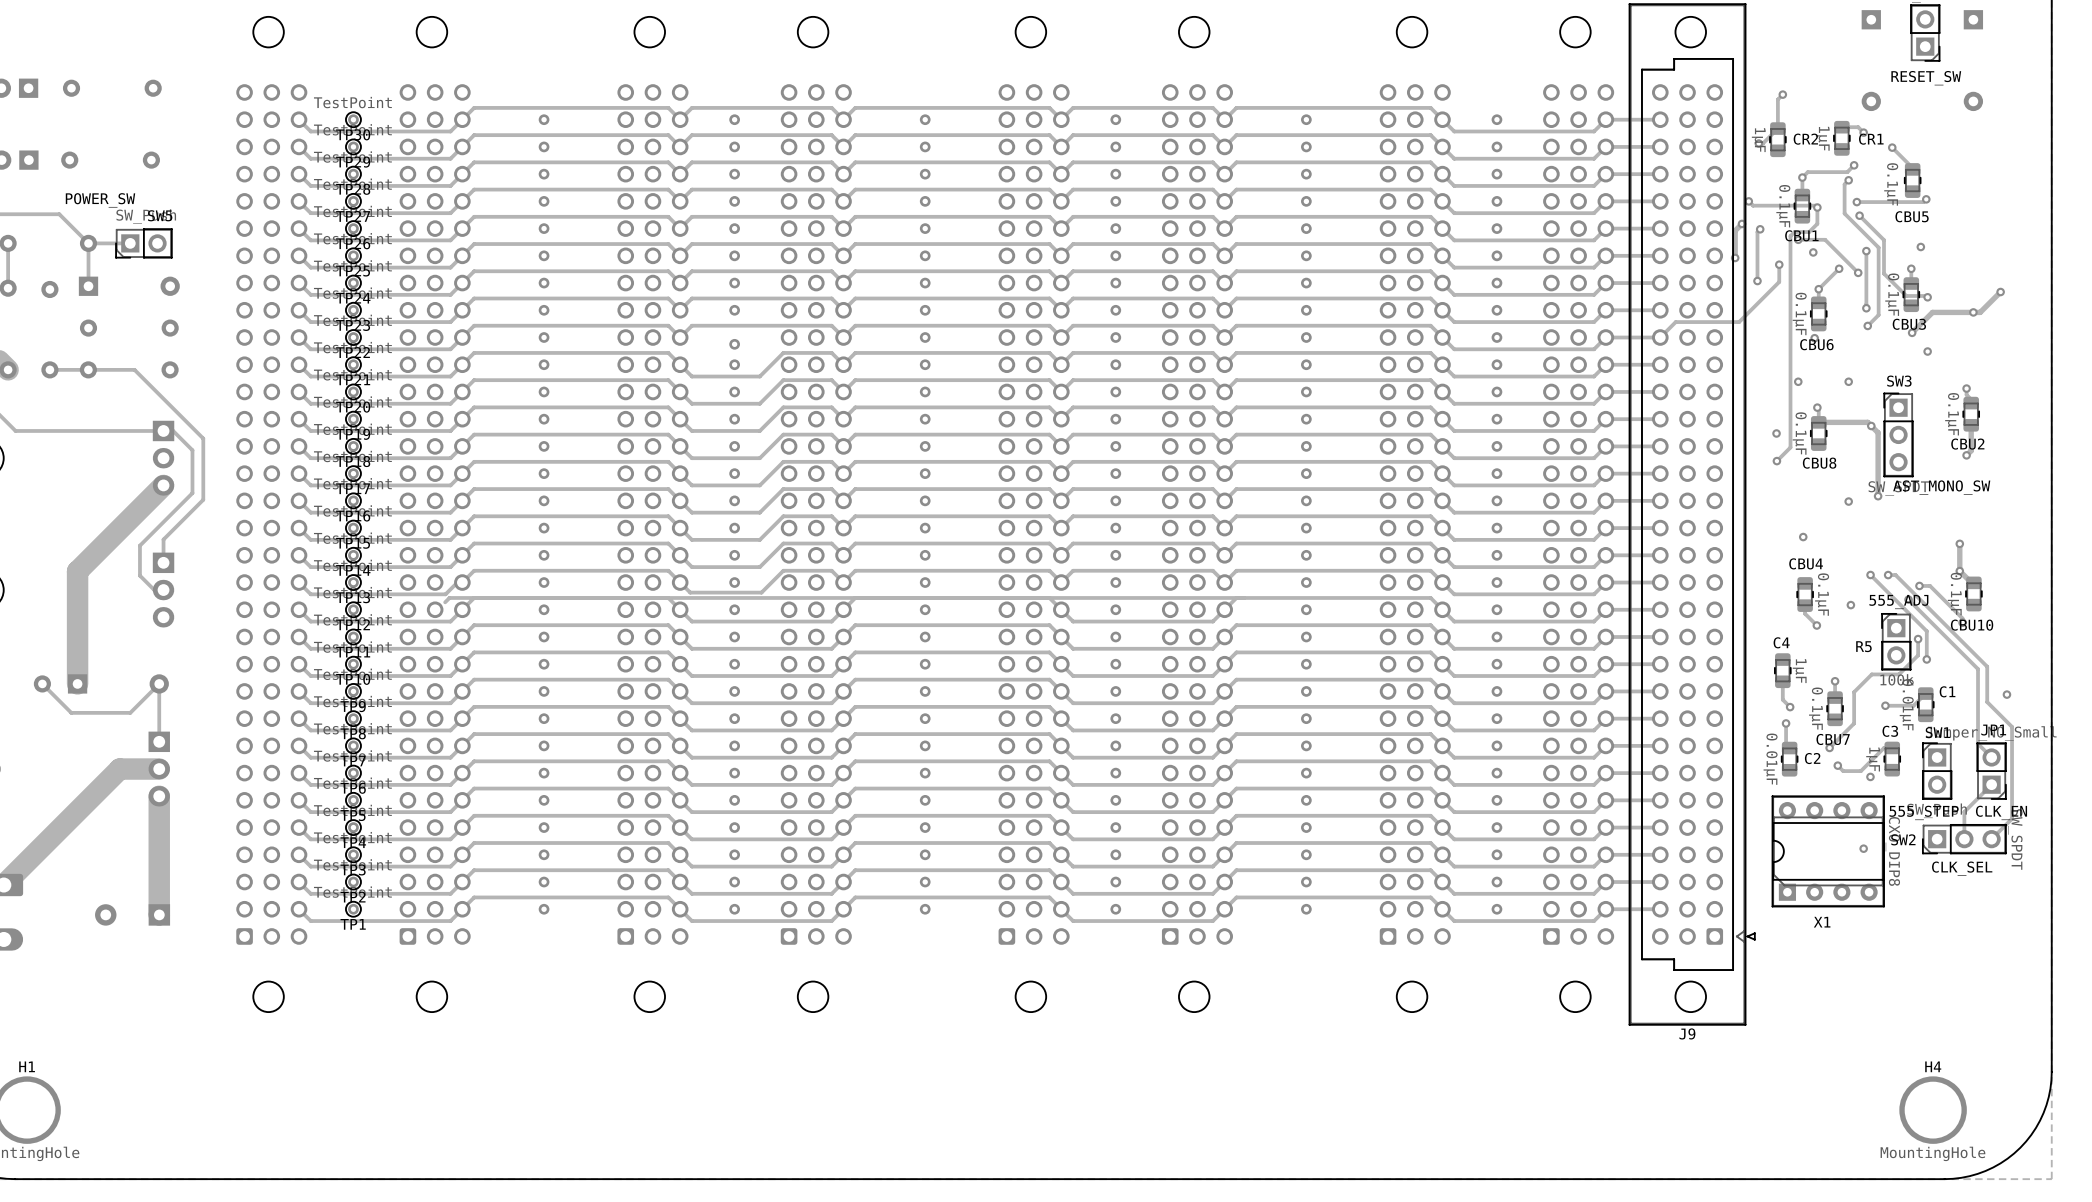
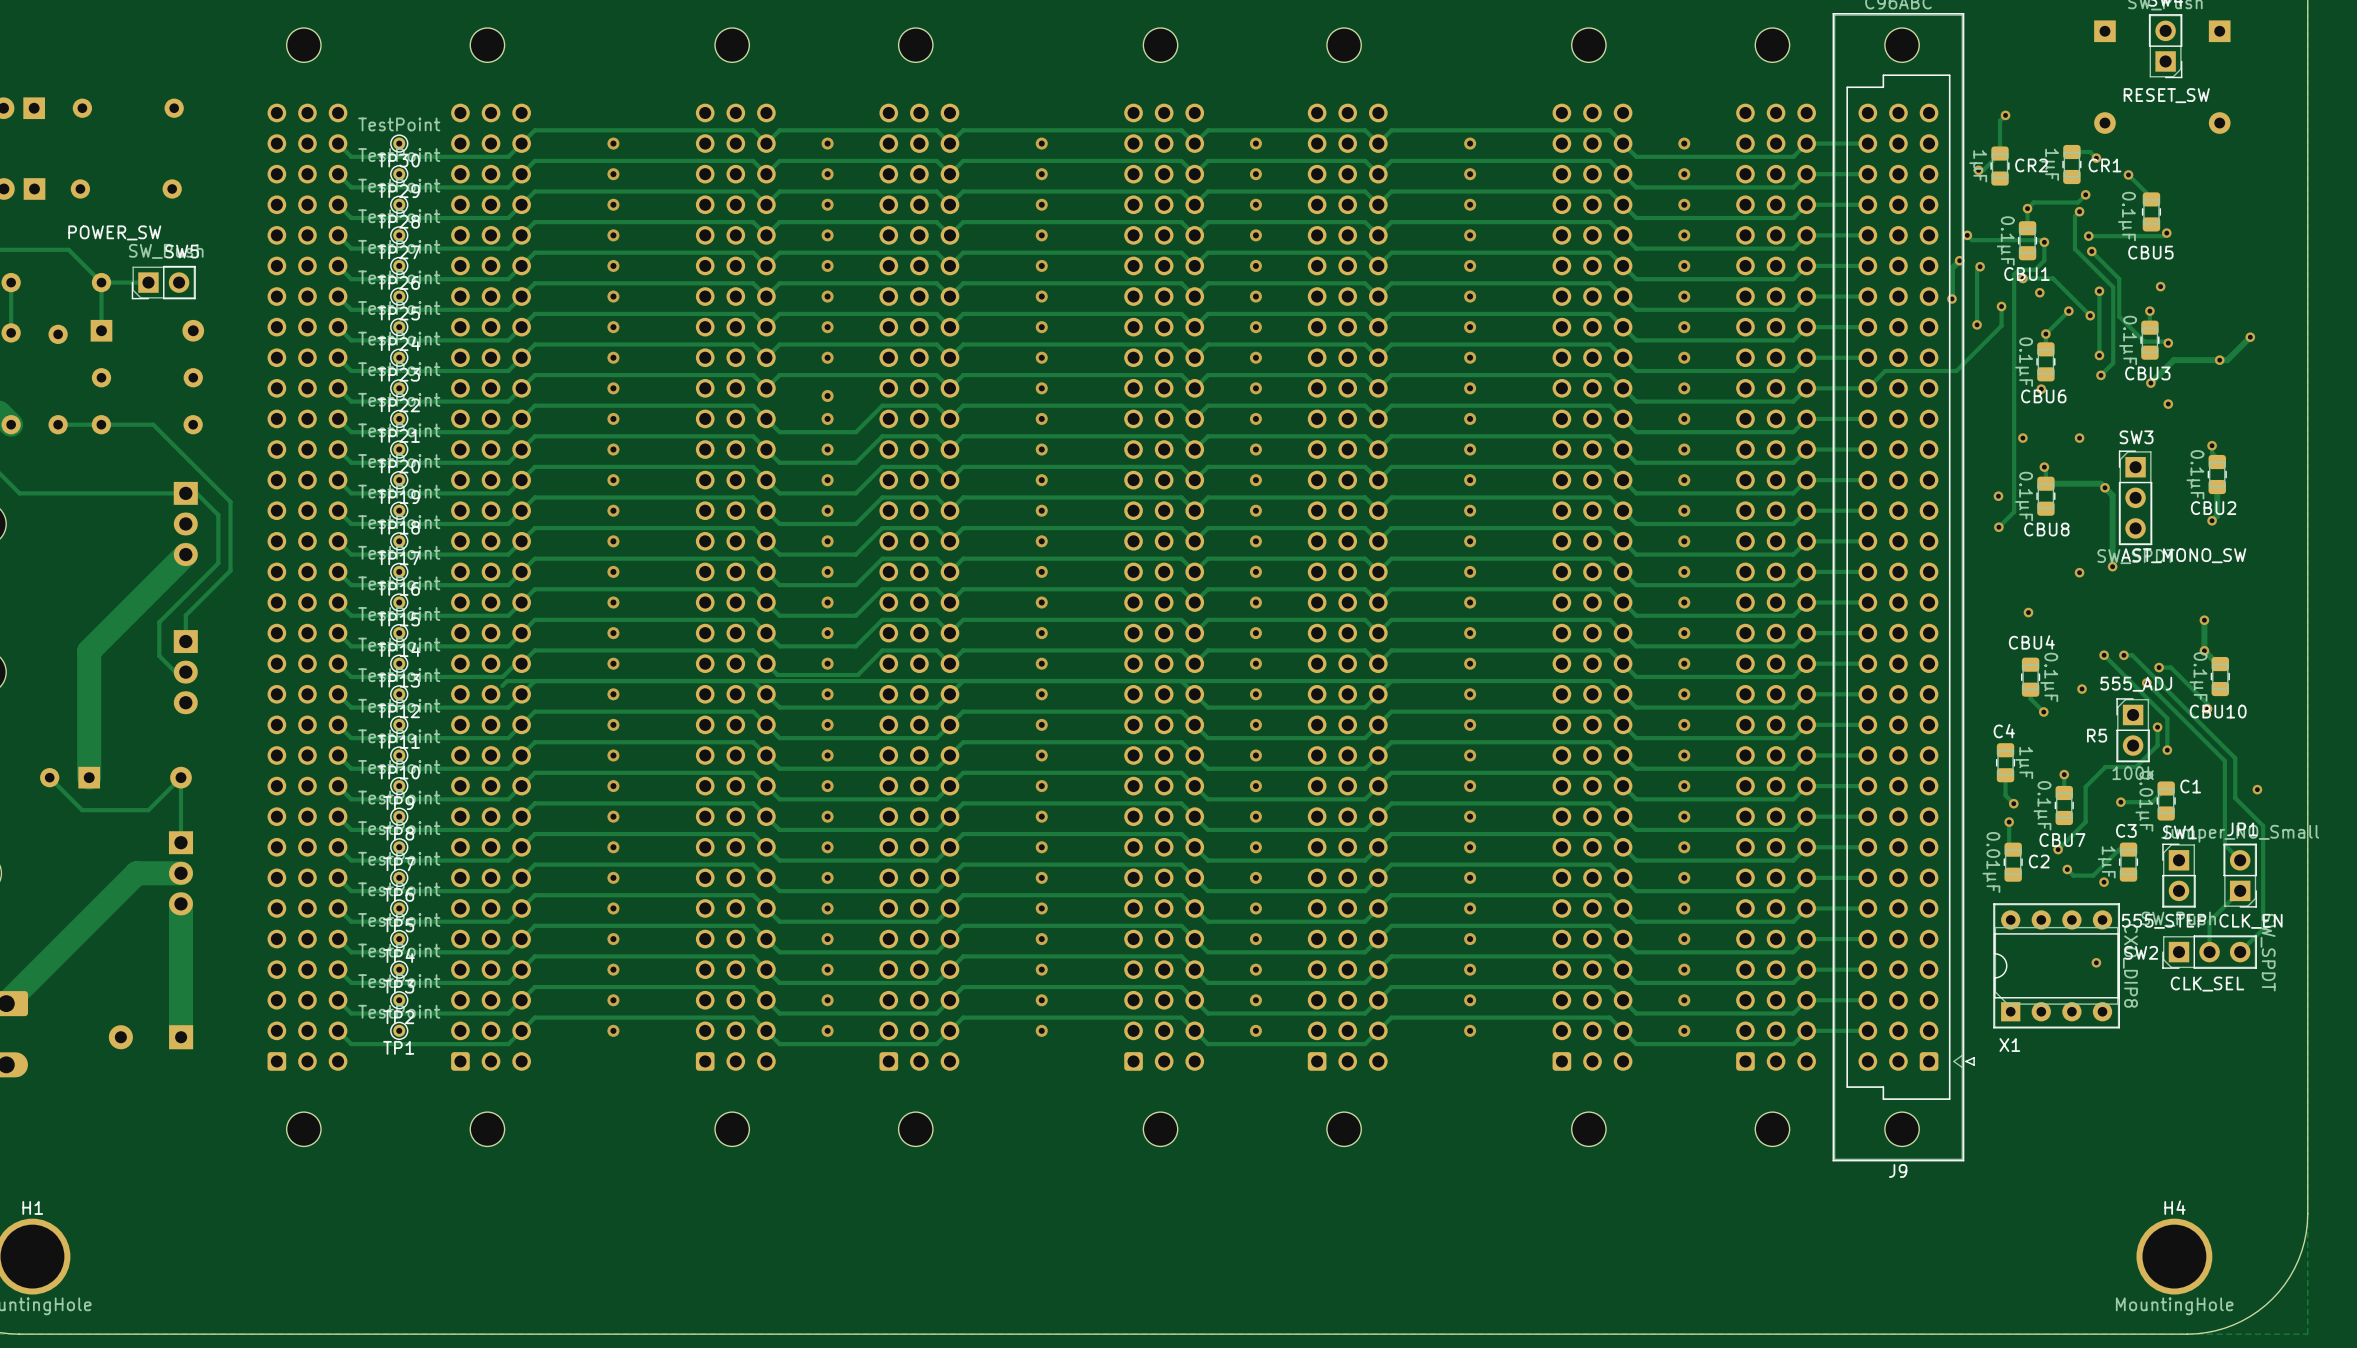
X1 name position: X1 (1822, 922) -> X1 (2009, 1045)

